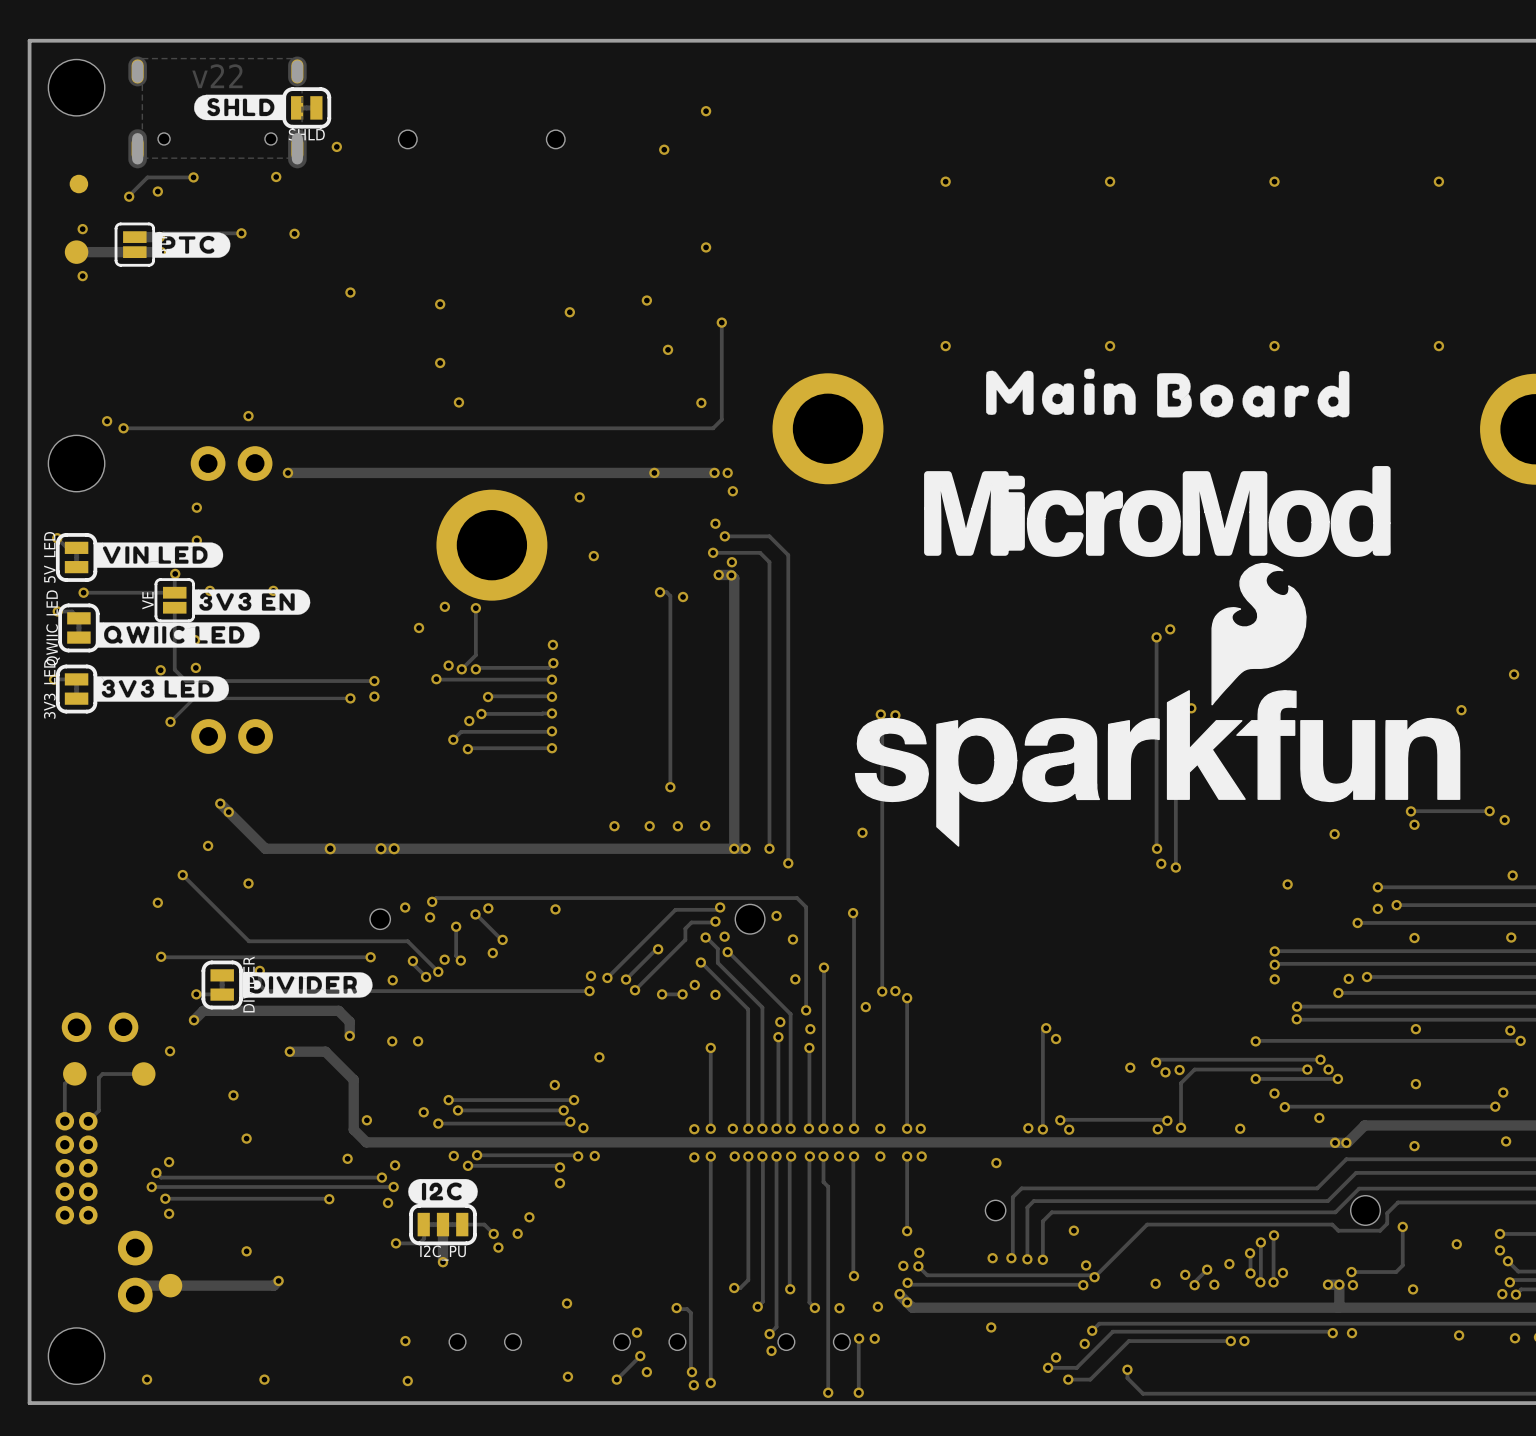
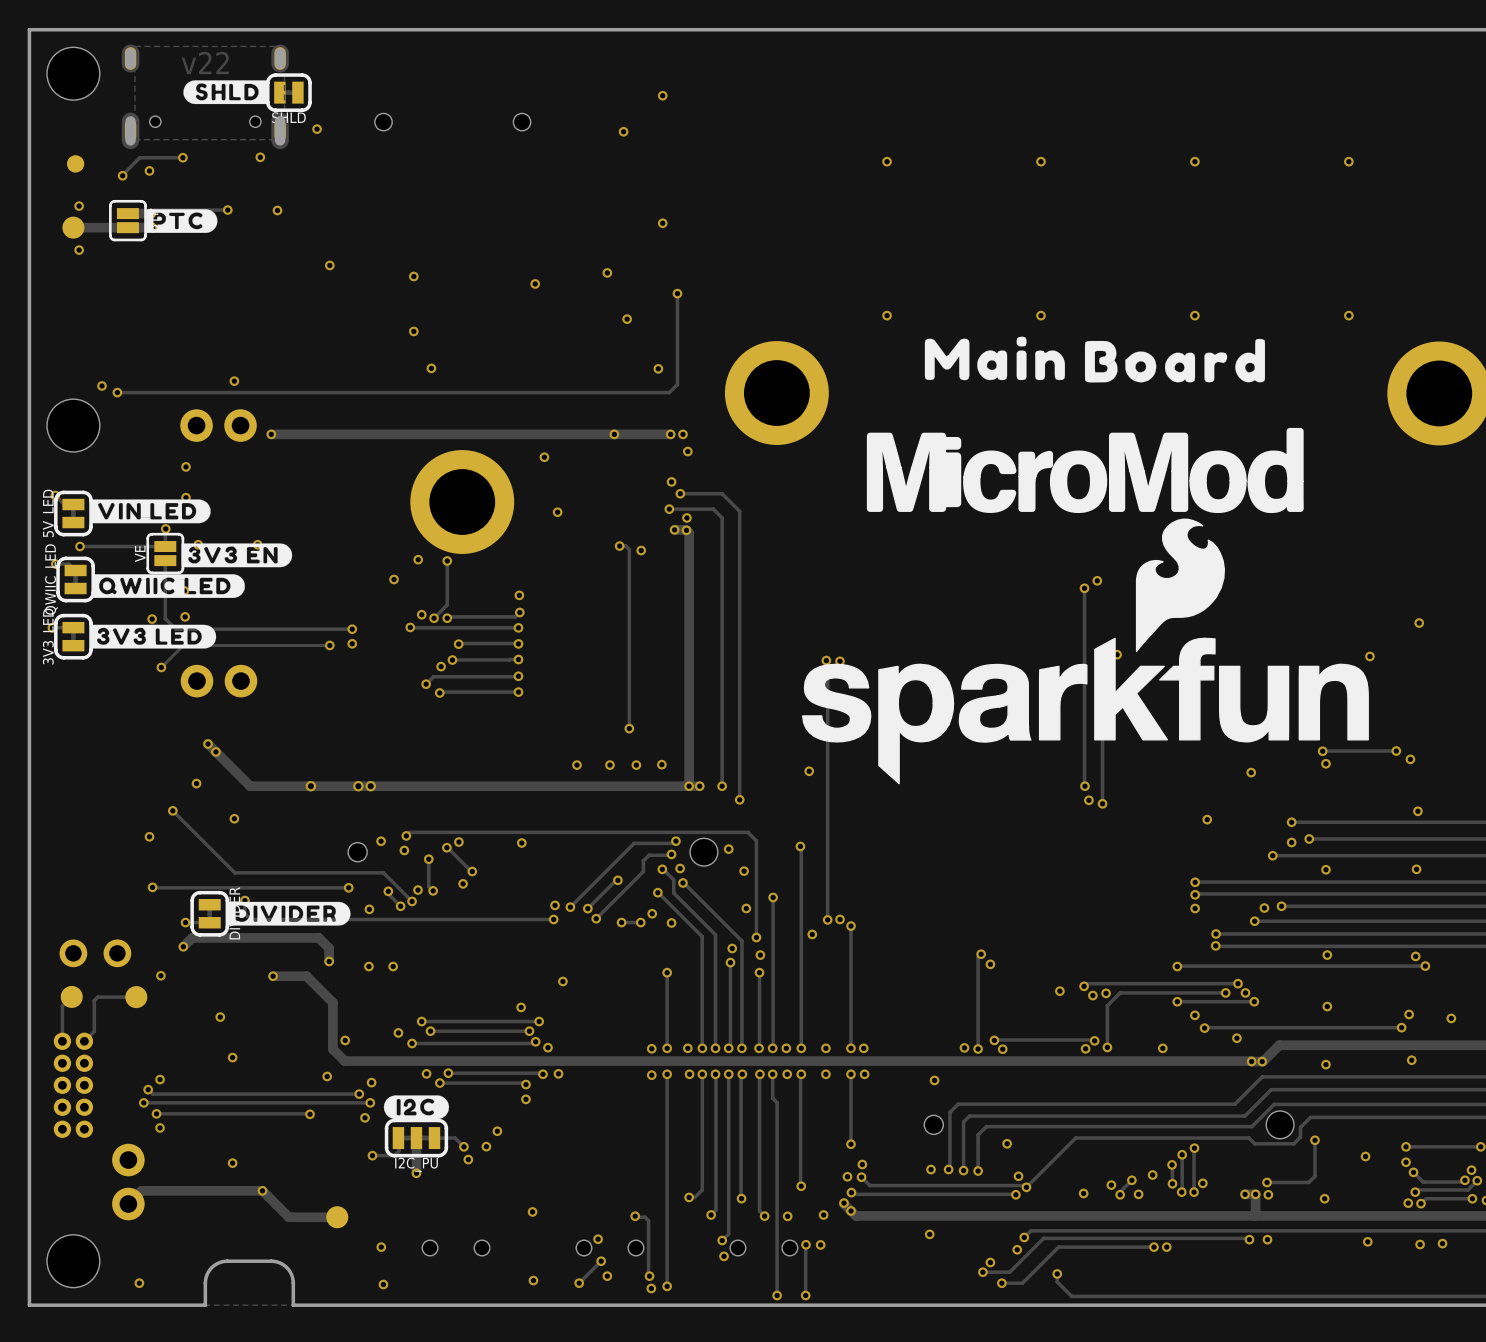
track: (278, 1280) (273, 1285) (144, 1285) -> (337, 1217) (288, 1217) (262, 1190) (141, 1190) (137, 1195)
part position: (170, 1285) -> (337, 1217)
via: (264, 1379) -> none
board edge: (311, 1403) (217, 1403) -> (293, 1305) (293, 1280) (290, 1272) (282, 1264) (271, 1261) (227, 1261) (216, 1264) (209, 1269) (206, 1277) (205, 1305)

